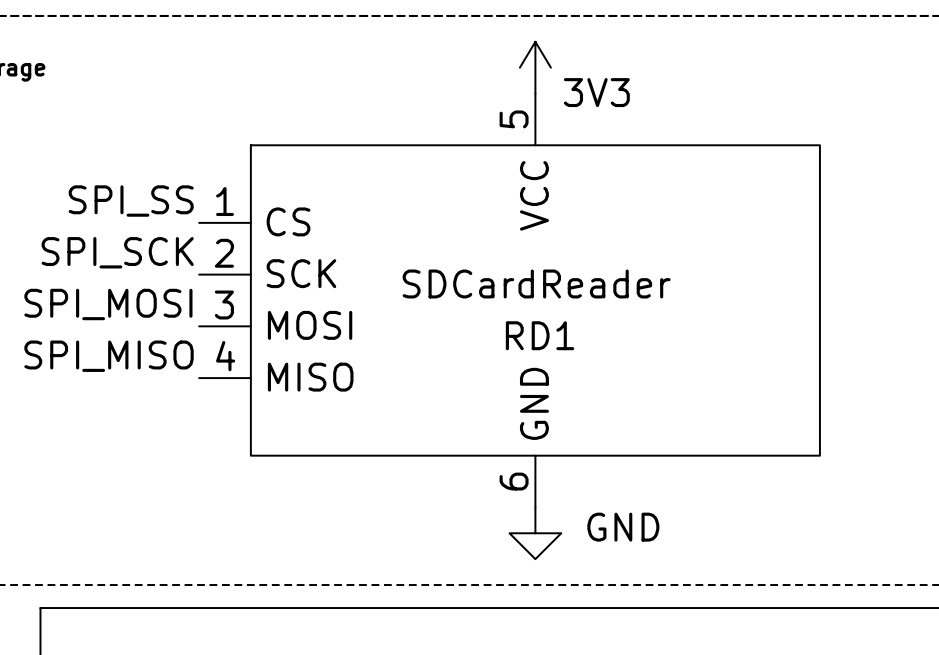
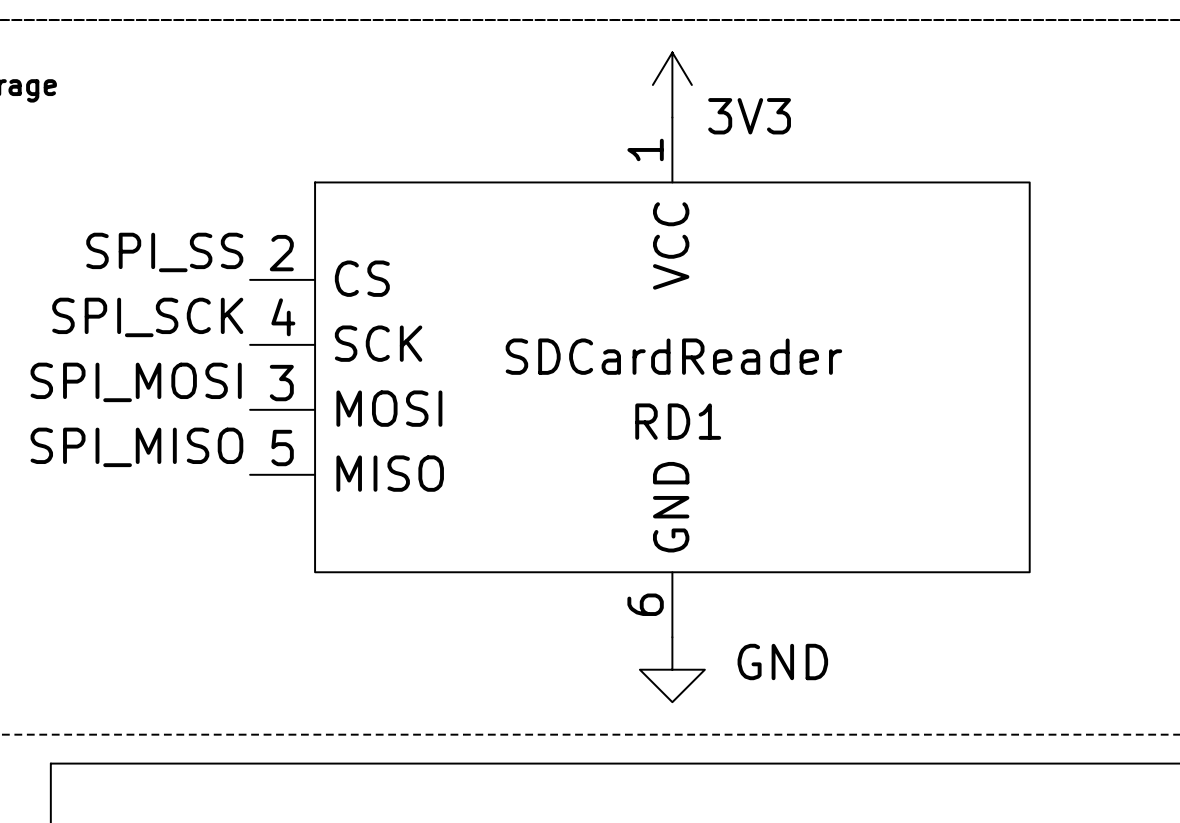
RD1 pin number: 5 (514, 119) -> 1 (645, 149)
RD1 pin number: 1 (225, 201) -> 2 (281, 253)
RD1 pin number: 2 (224, 253) -> 4 (283, 317)
RD1 pin number: 4 (225, 356) -> 5 (282, 448)

